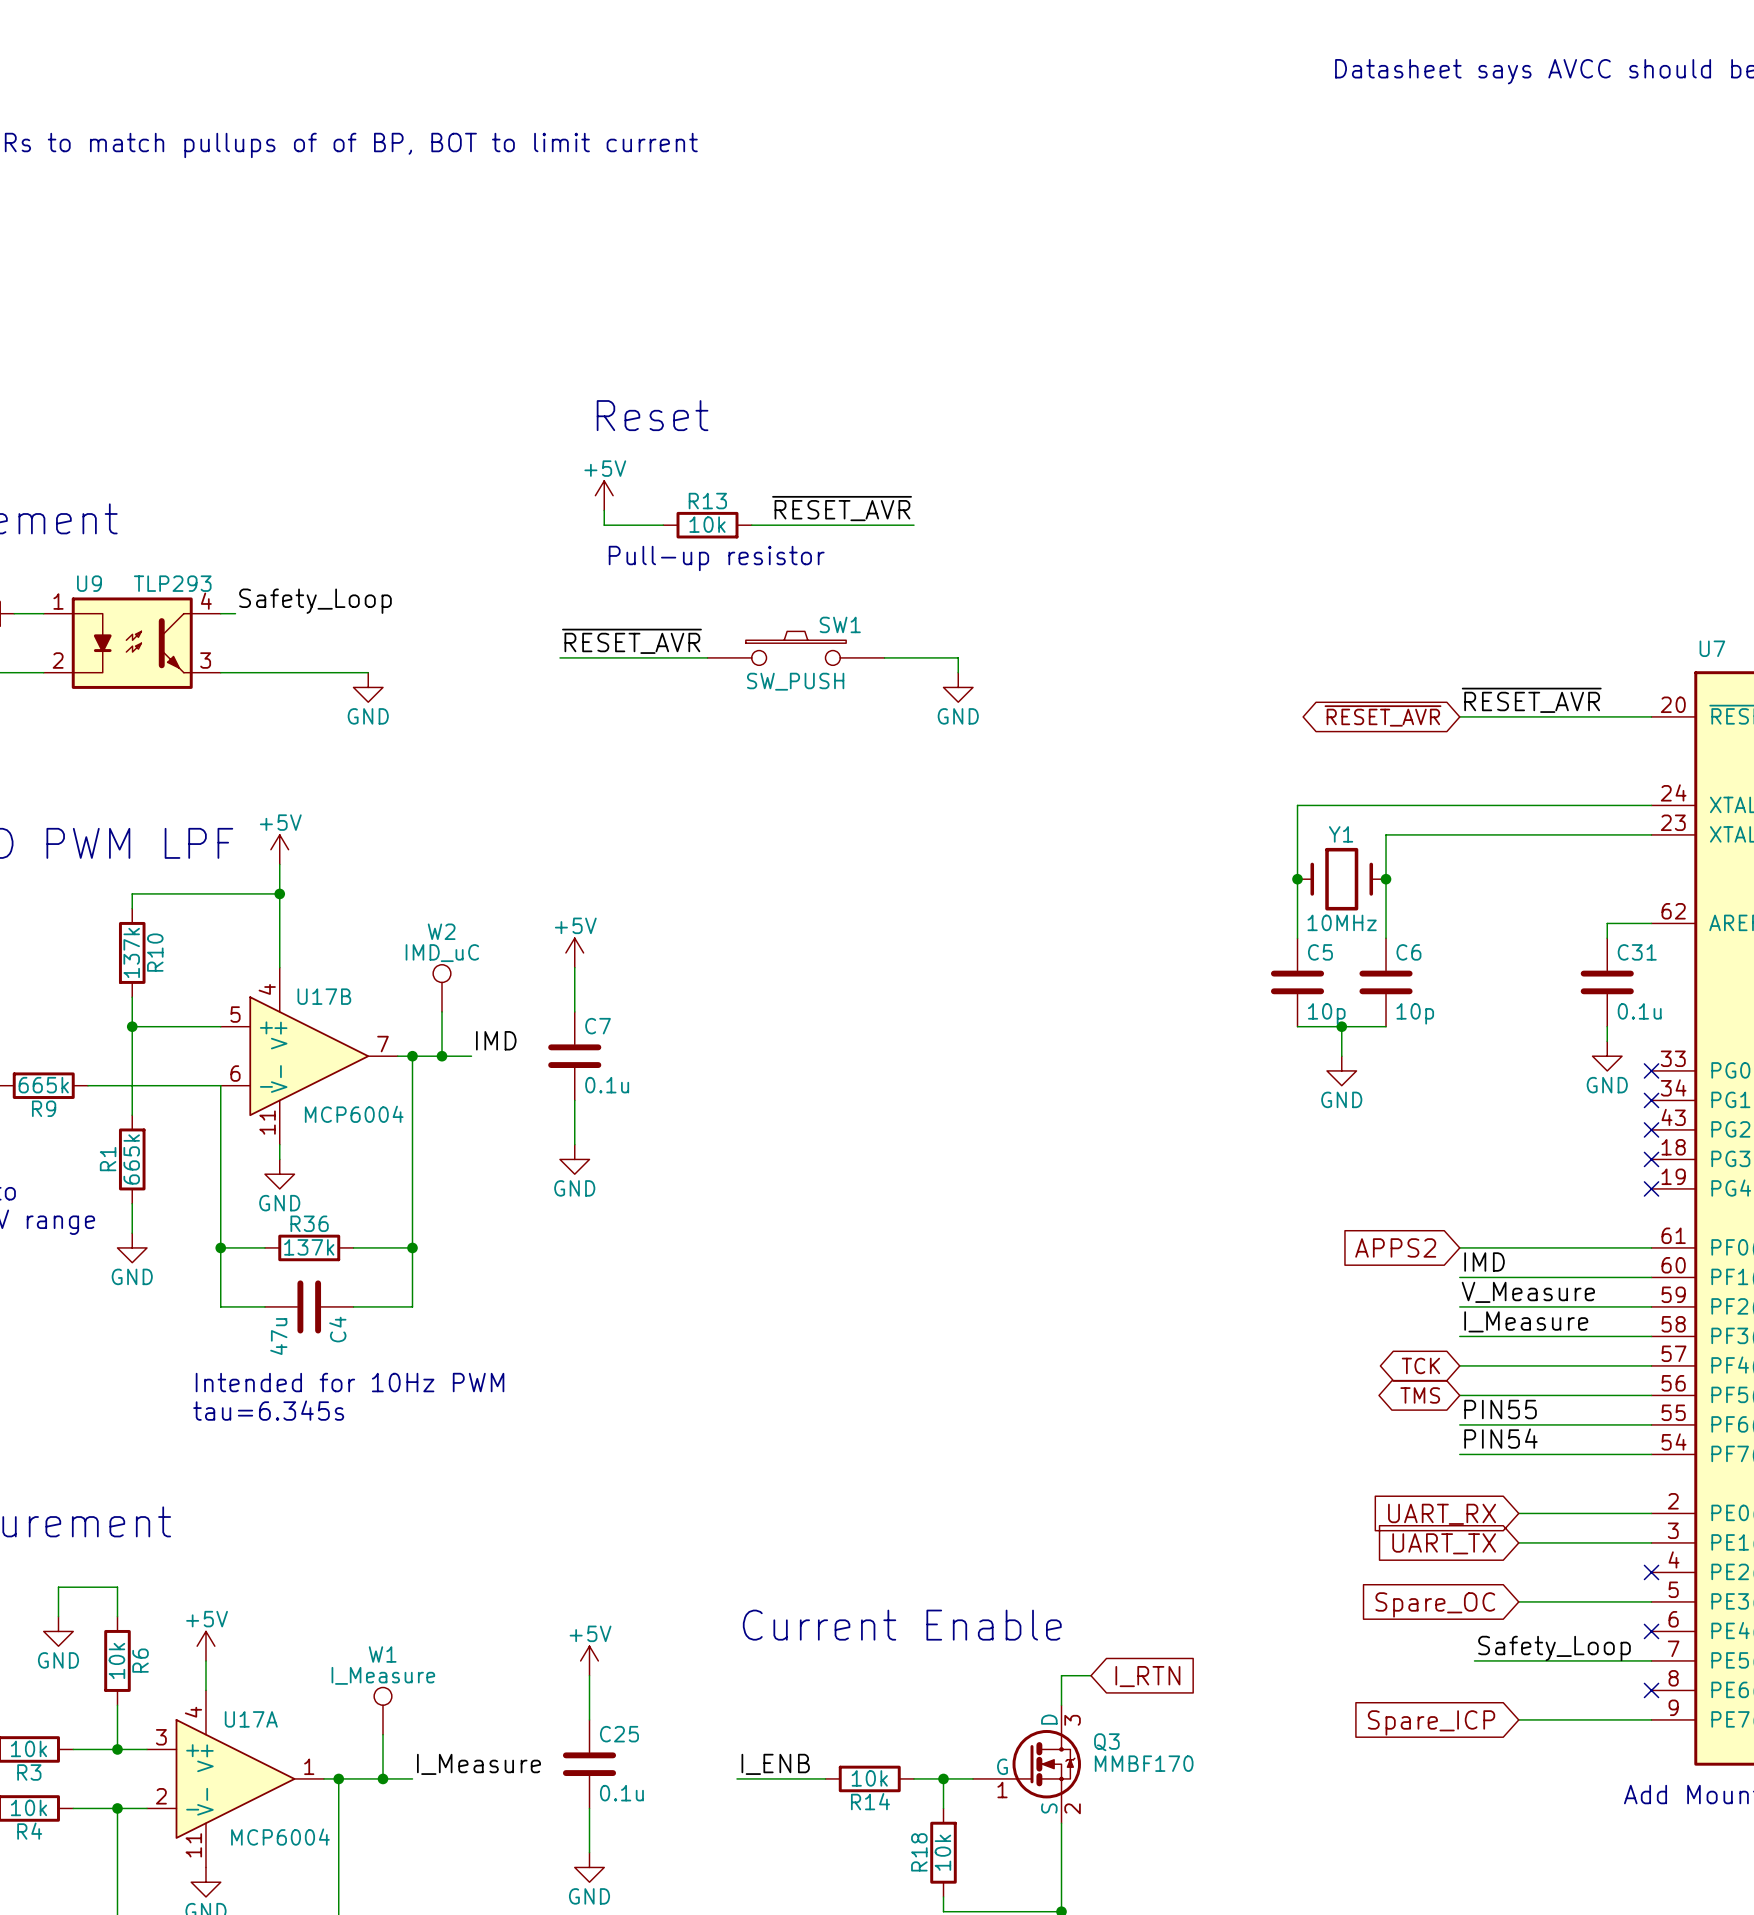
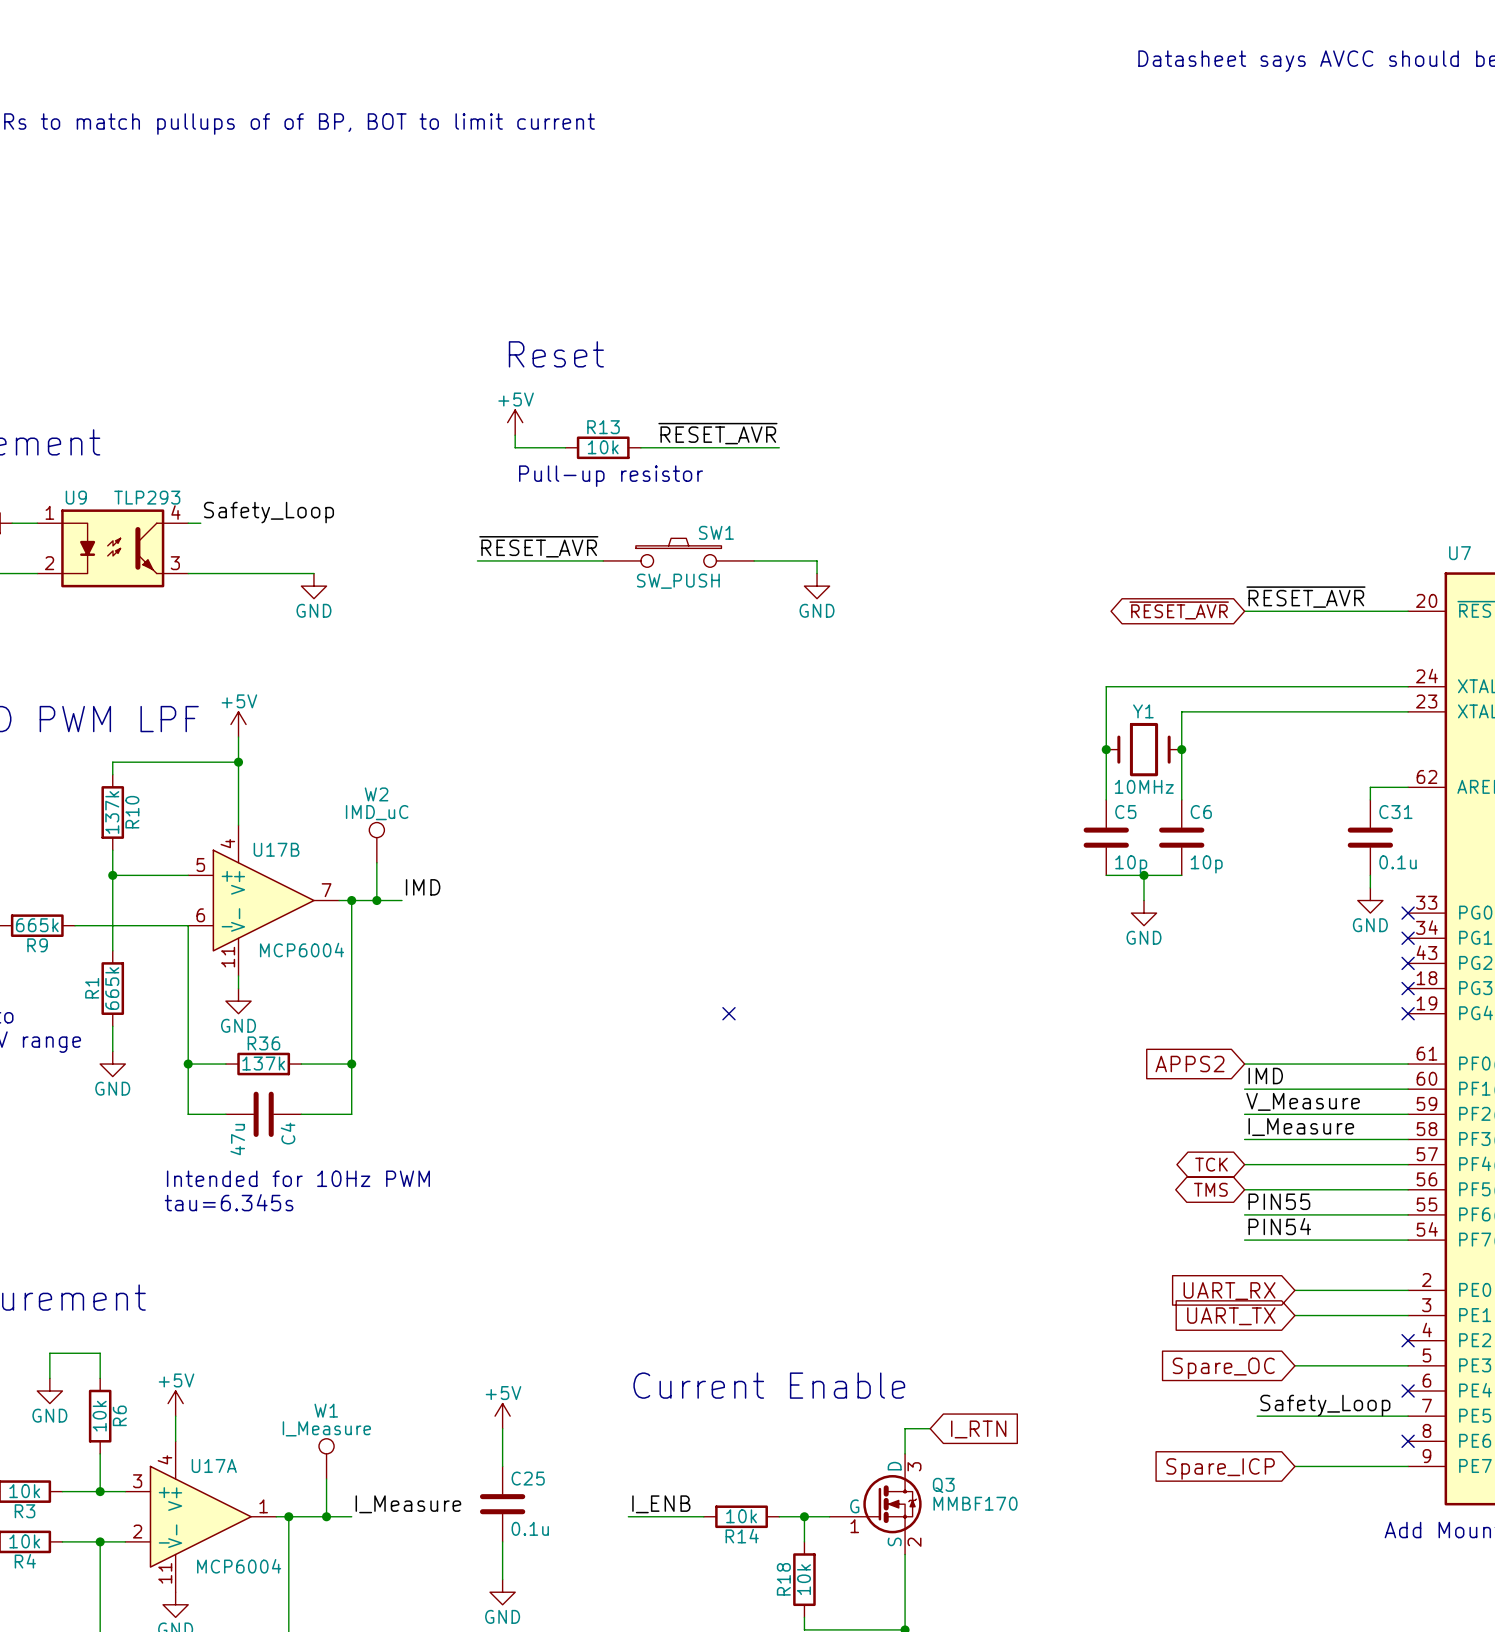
power symbol: +5V (574, 952) -> none
wire: (574, 967) (574, 1011) -> none
C7: 0.1u (574, 1056) -> none
wire: (574, 1100) (574, 1144) -> none
power symbol: GND (574, 1159) -> none
no-connect mark: none -> (728, 1013)

